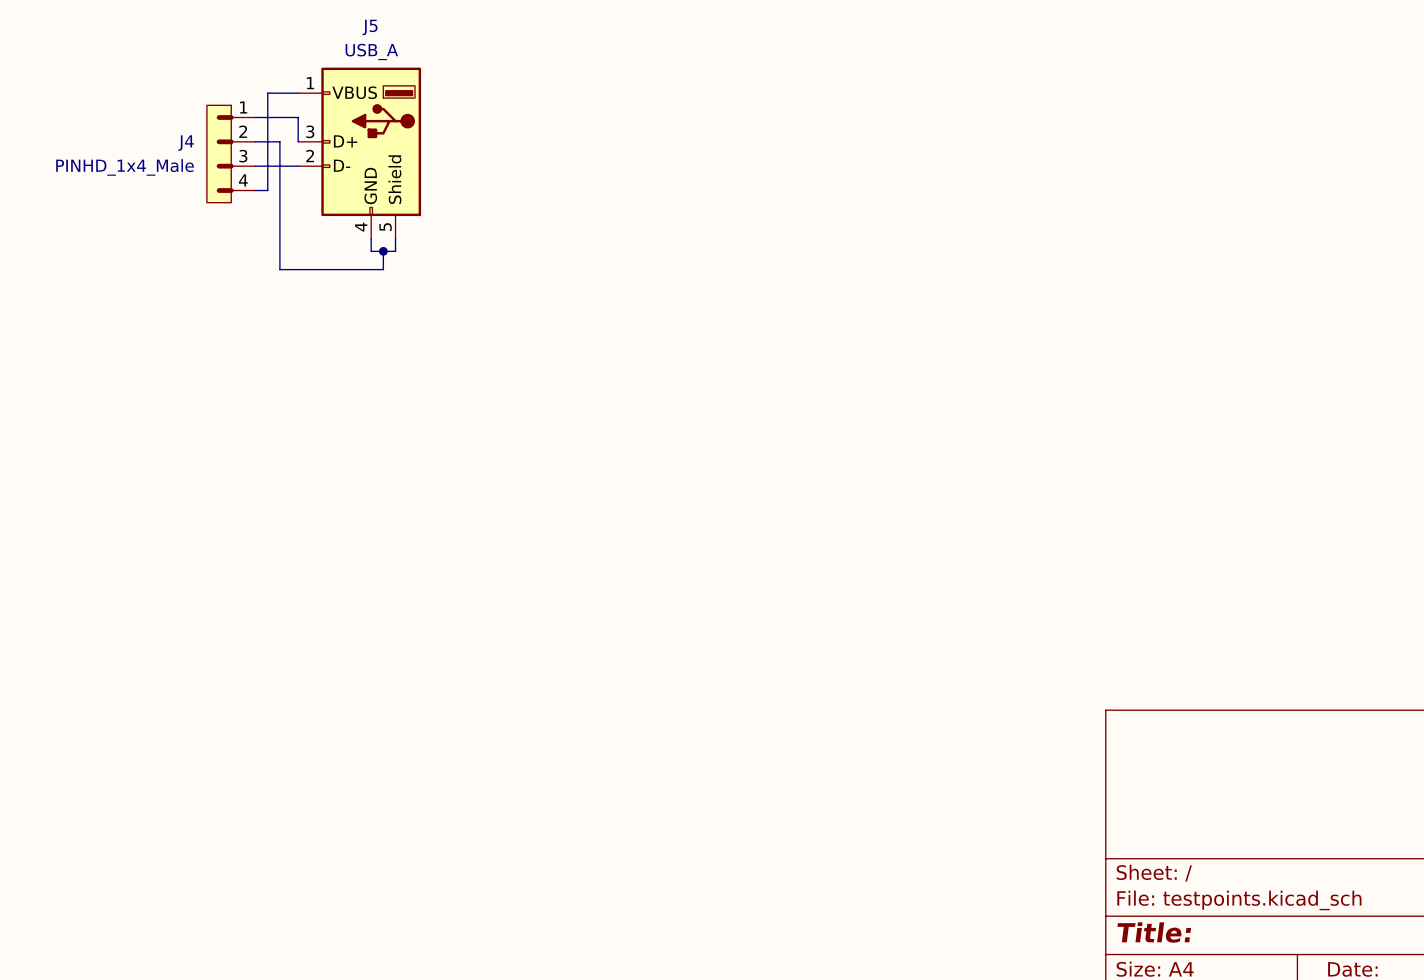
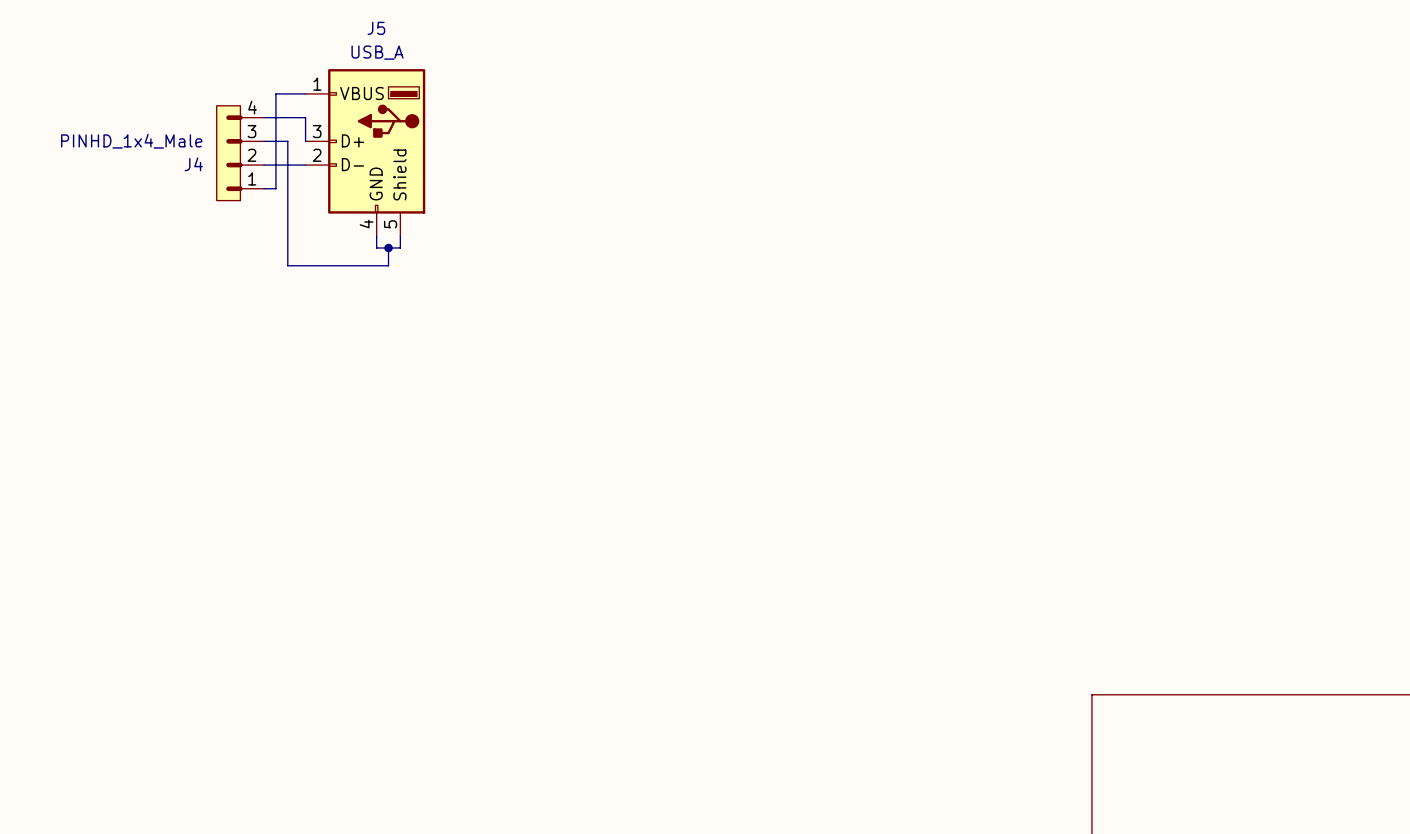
J4 flip: as is (220, 154) -> up-down (229, 153)

